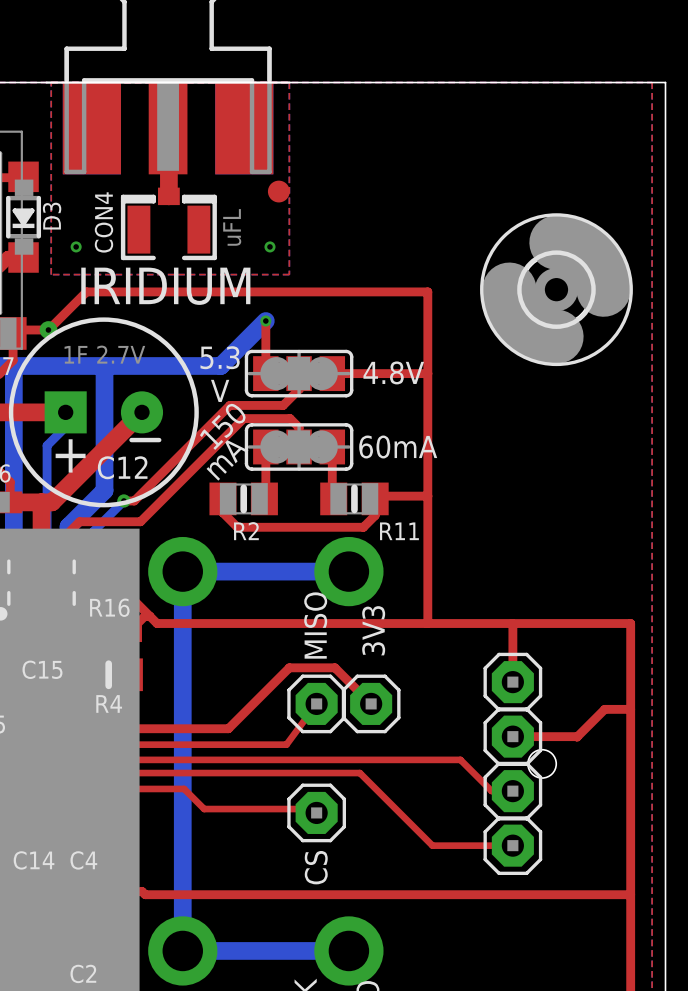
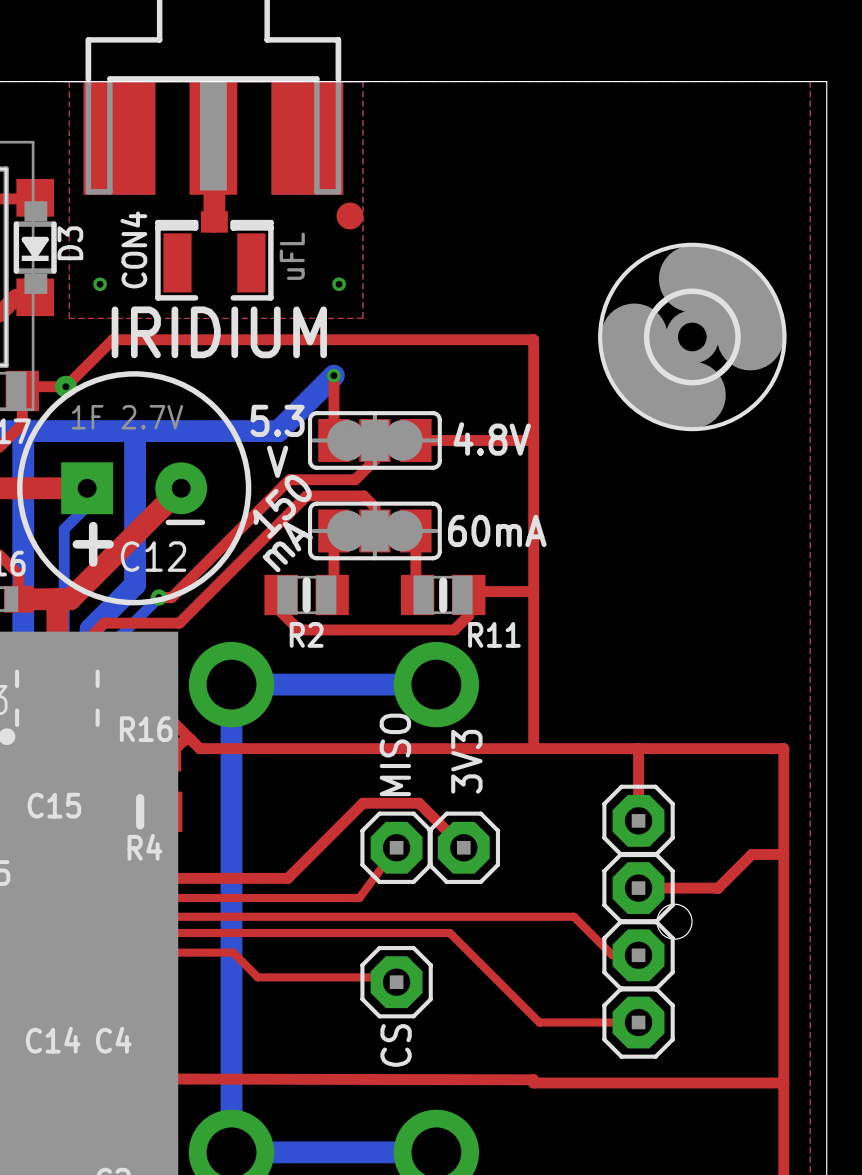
top track: (101, 892) (142, 891) (145, 894) (427, 894) -> (130, 979) (130, 1077) (133, 1078) (533, 1079) (533, 1083)

